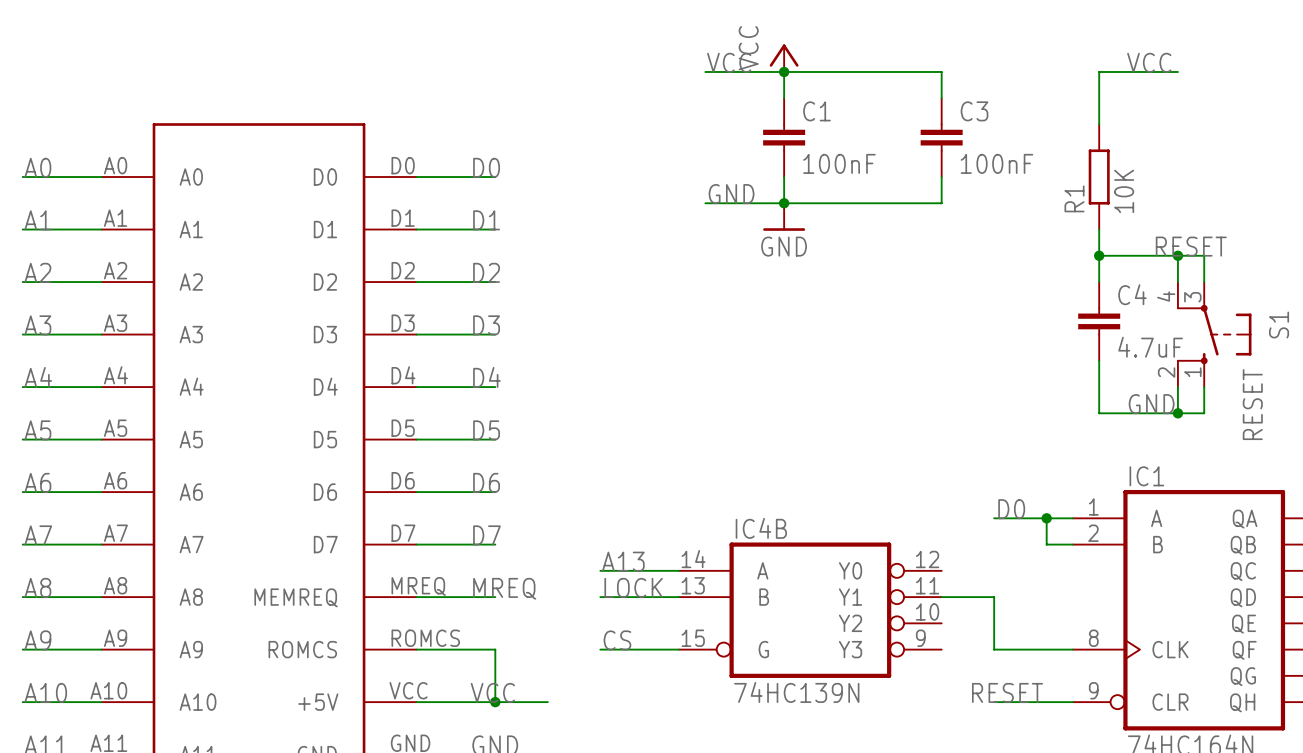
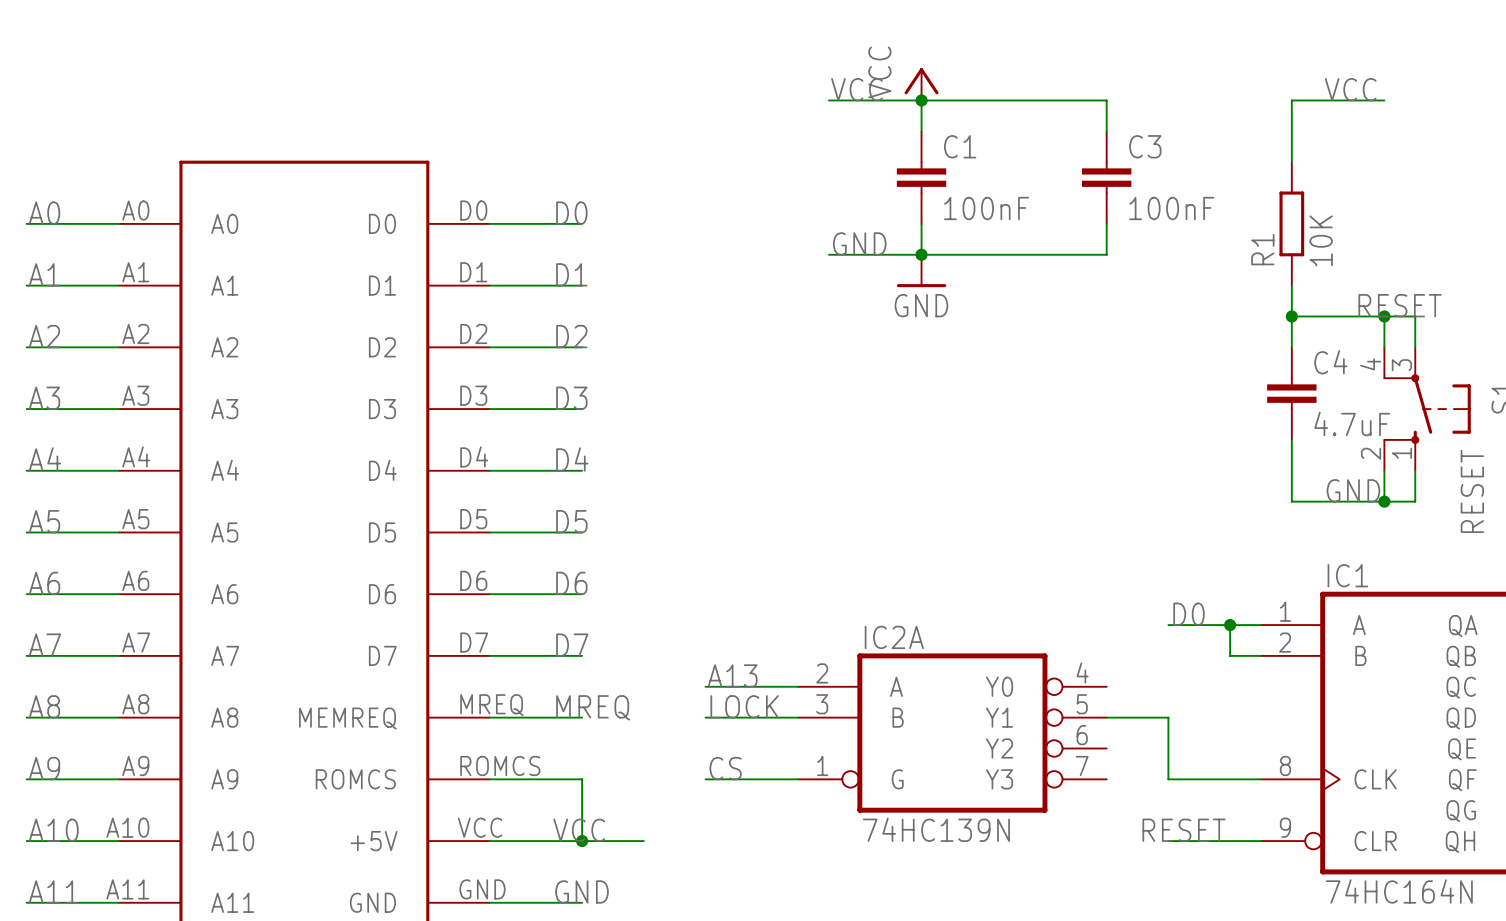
IC4B name: IC4B (761, 528) -> IC2A (894, 637)
IC4B pin number: 14 (693, 559) -> 2 (822, 673)
IC4B pin number: 12 (927, 559) -> 4 (1082, 672)
IC4B pin number: 13 (693, 585) -> 3 (822, 704)
IC4B pin number: 11 (927, 585) -> 5 (1082, 704)
IC4B pin number: 10 (927, 611) -> 6 (1082, 735)
IC4B pin number: 15 (693, 638) -> 1 (822, 765)
IC4B pin number: 9 (920, 638) -> 7 (1082, 765)

